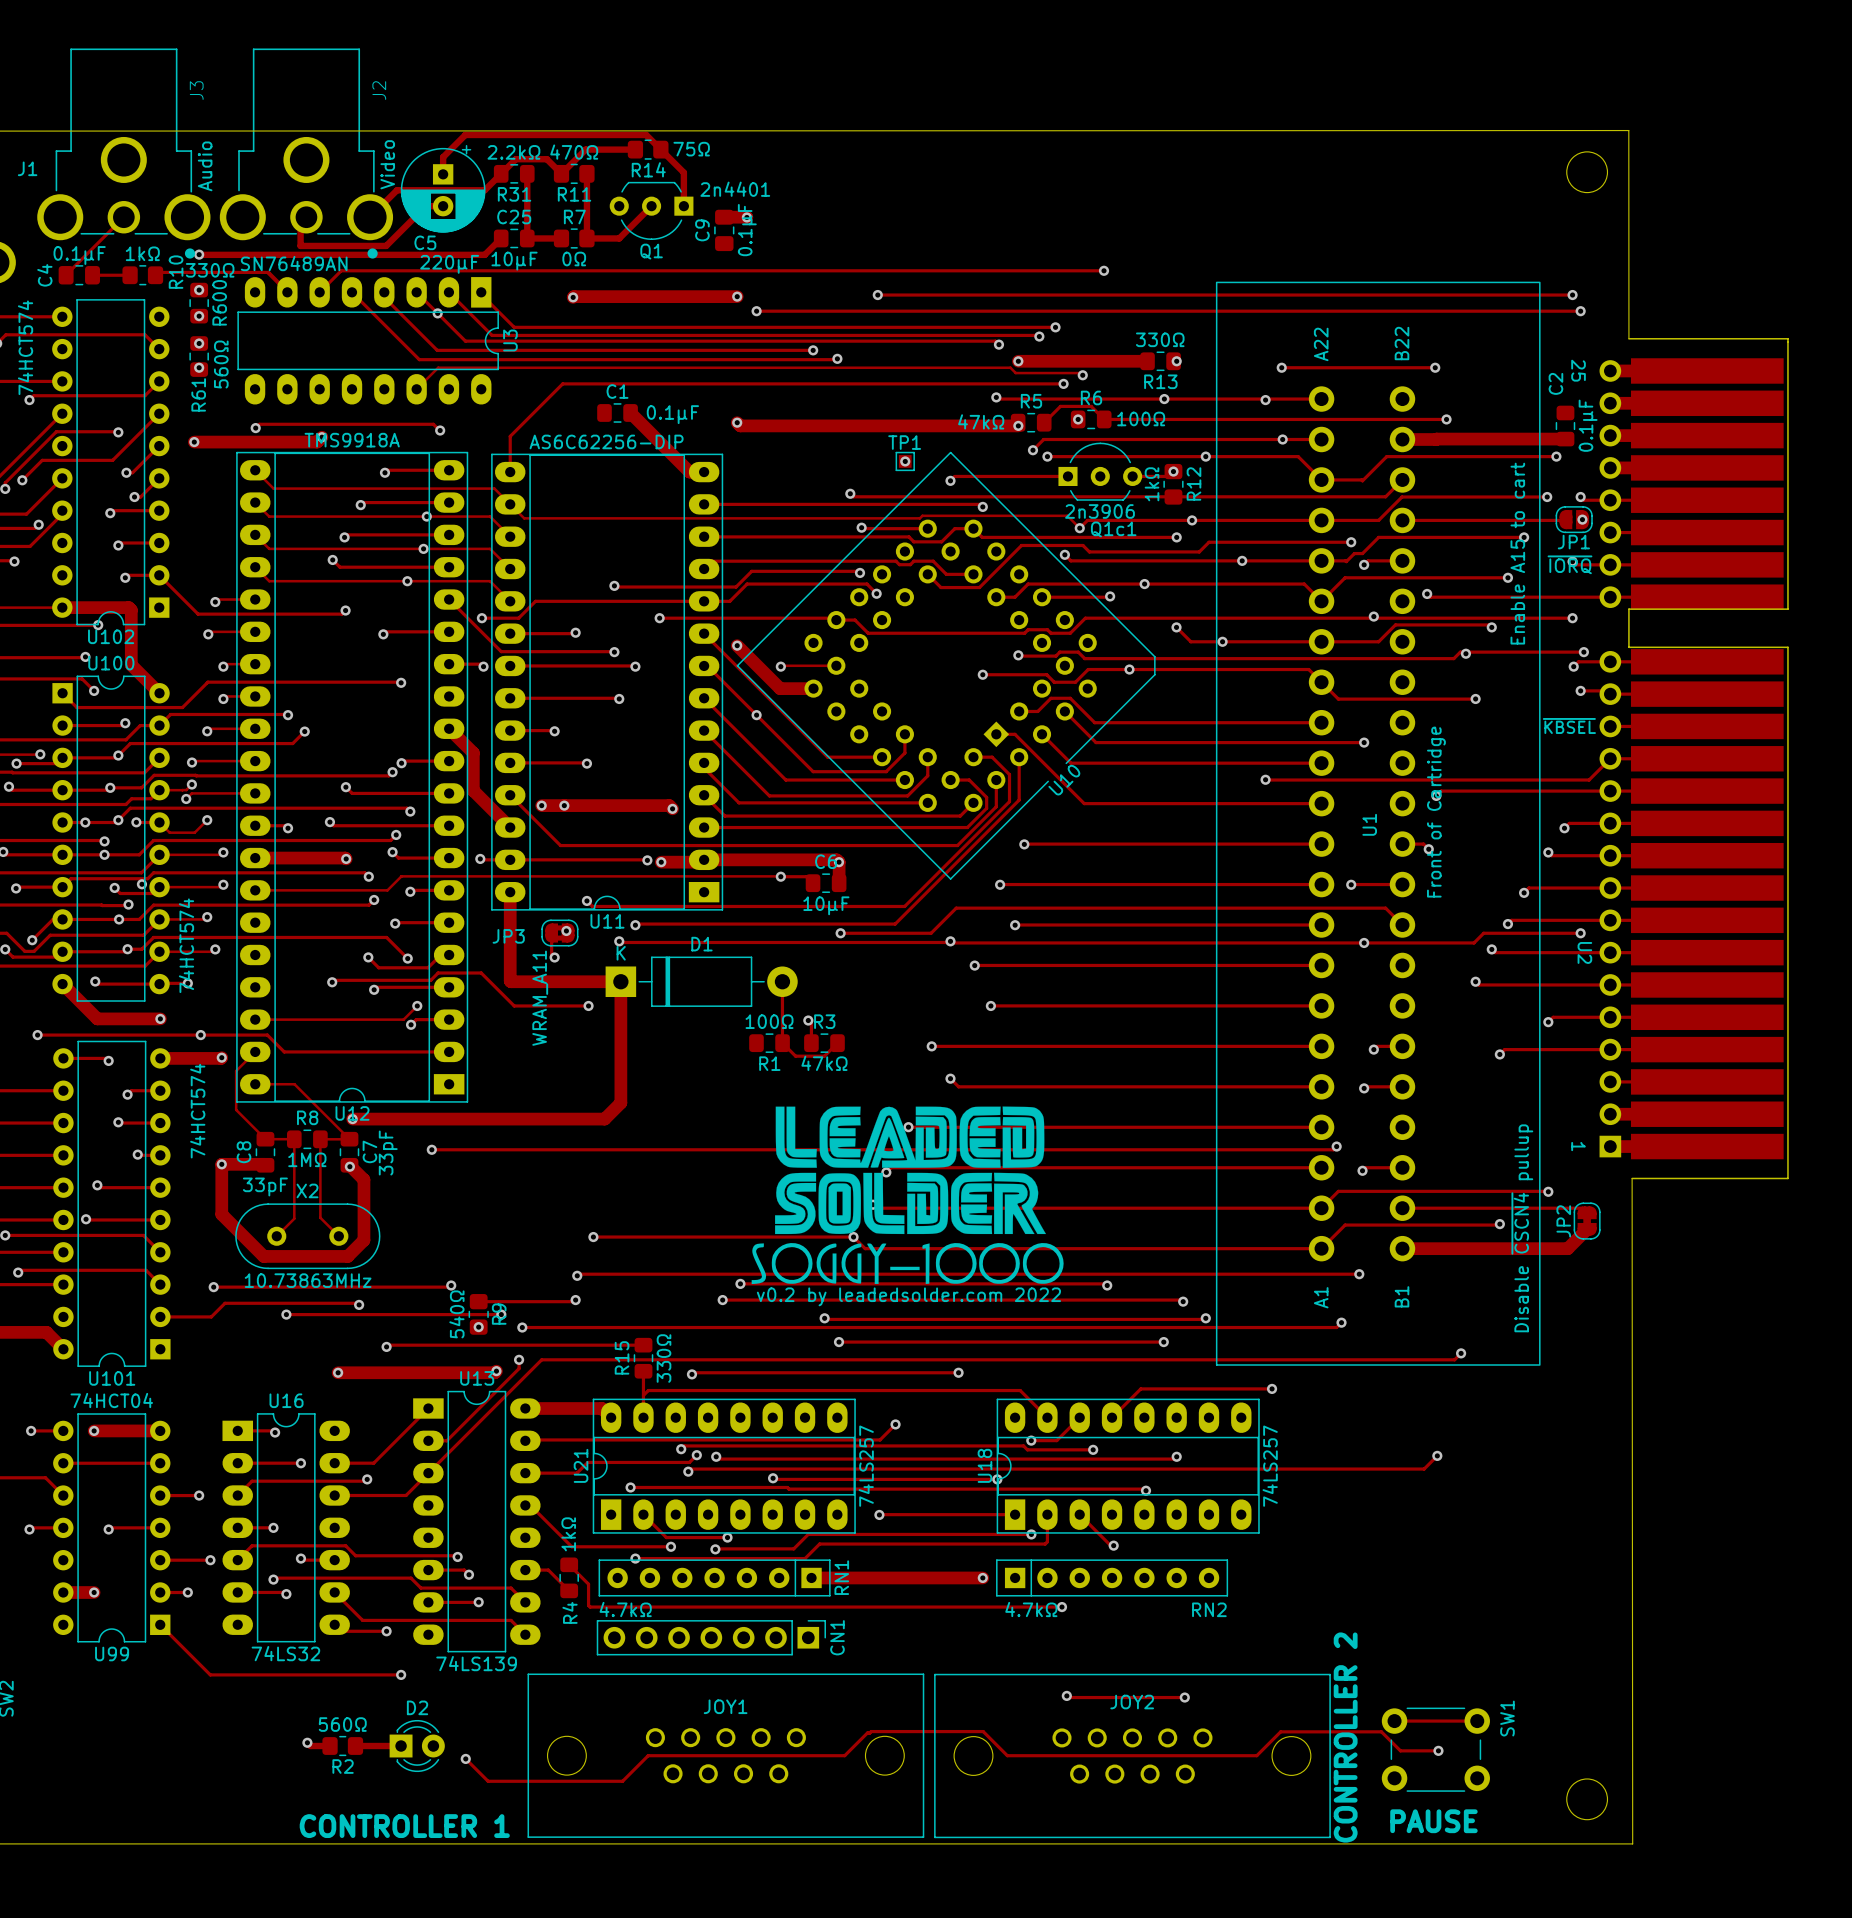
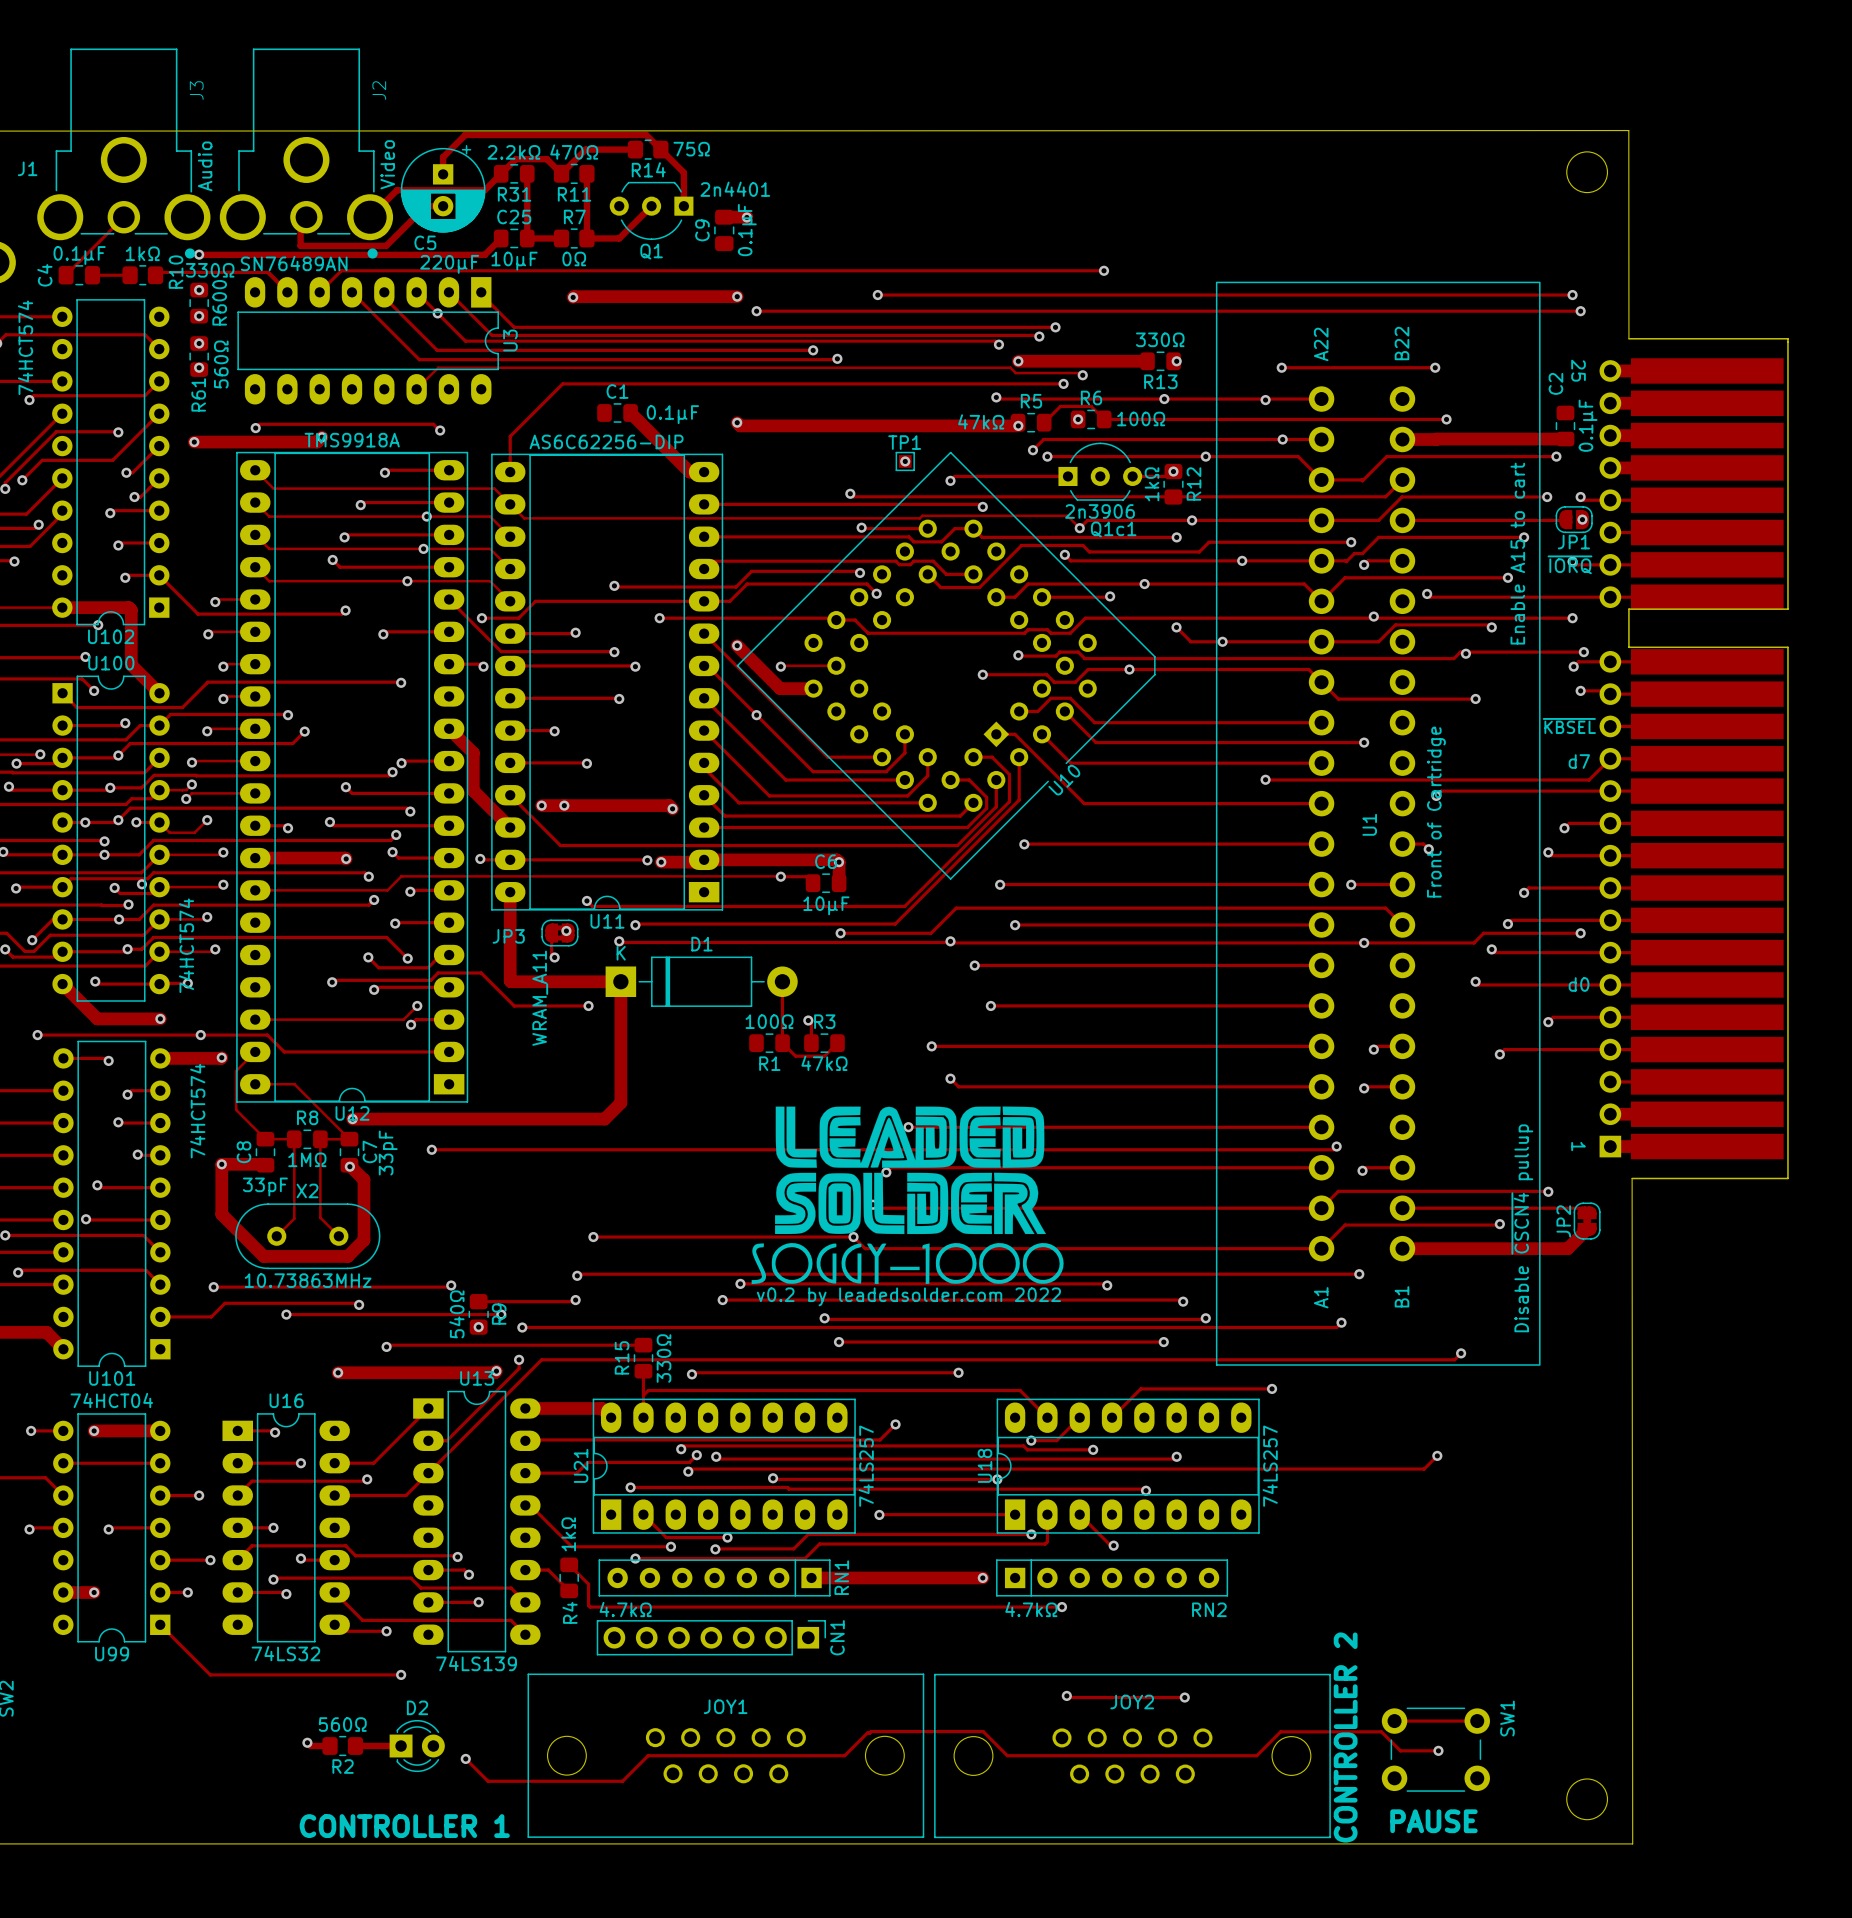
text: none -> d7 (1579, 761)
U2 name: U2 (1584, 952) -> none
text: none -> d0 (1579, 984)

